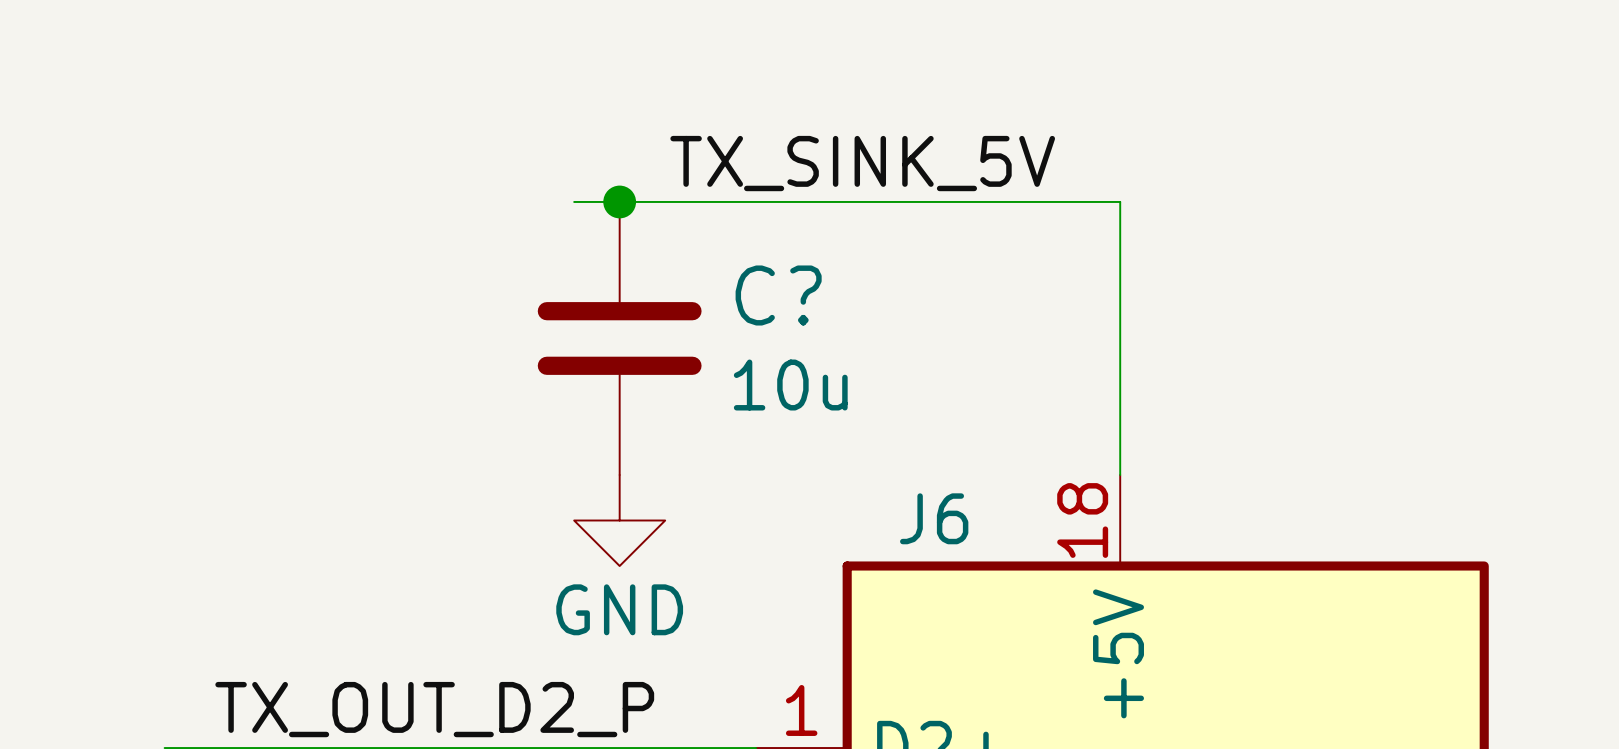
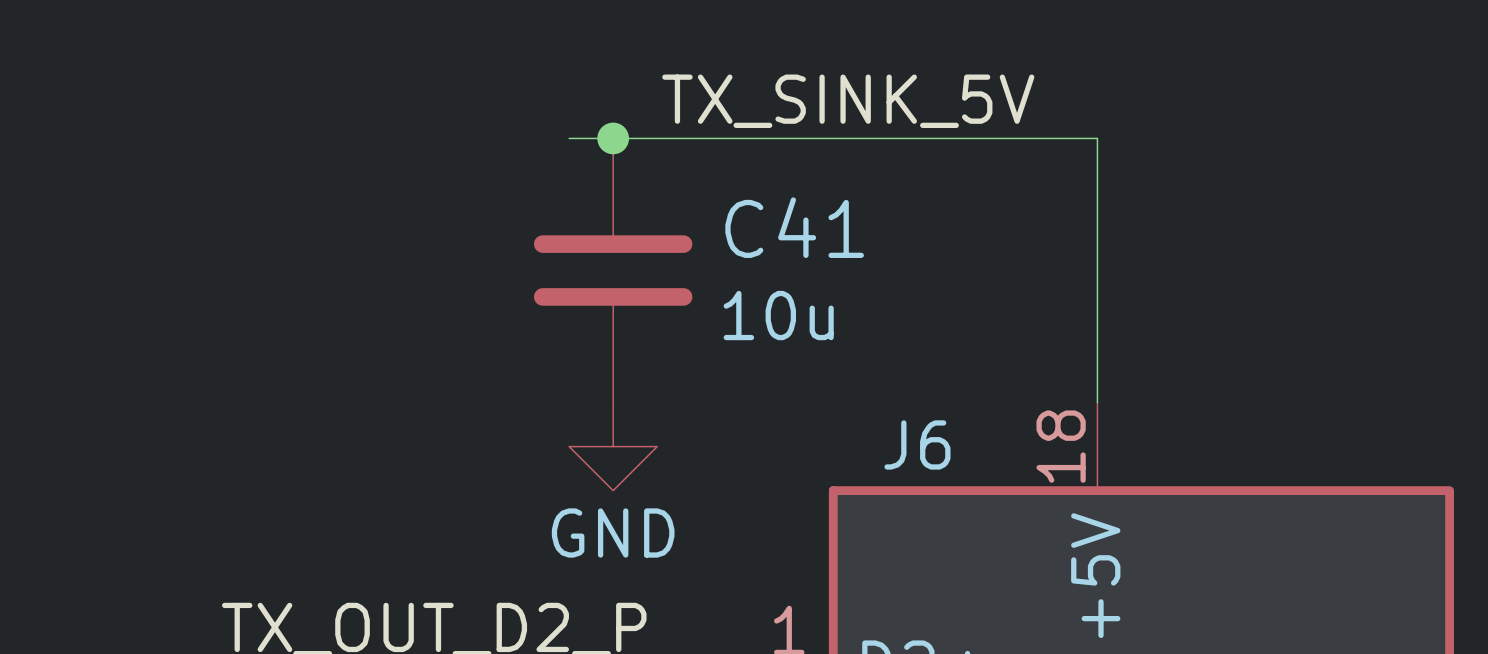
C? name: C? (778, 295) -> C41 (794, 227)

